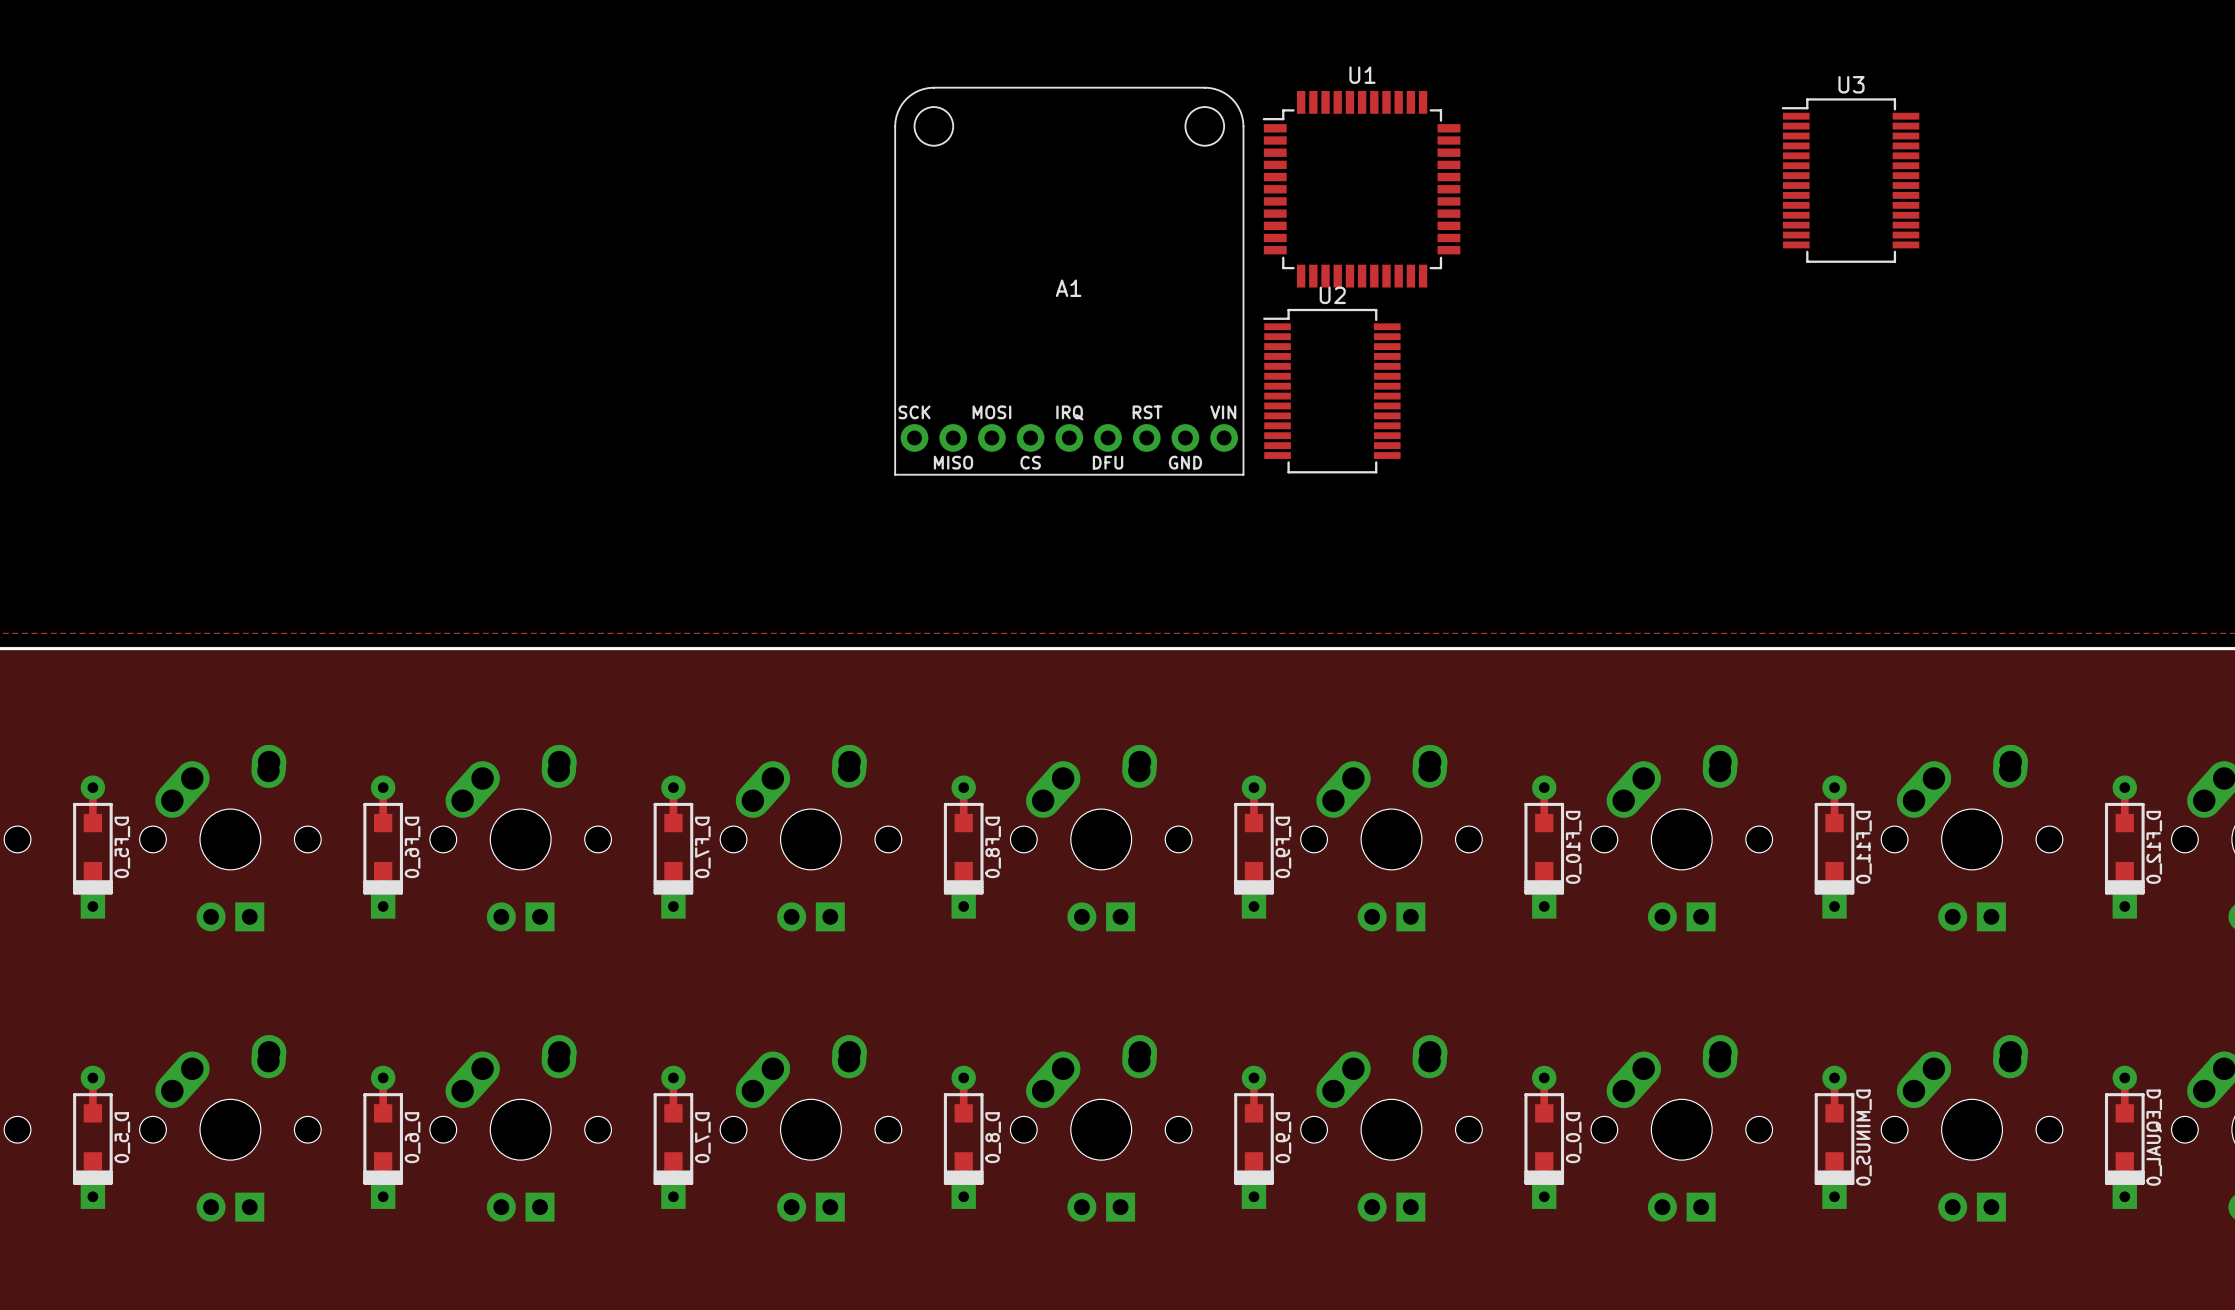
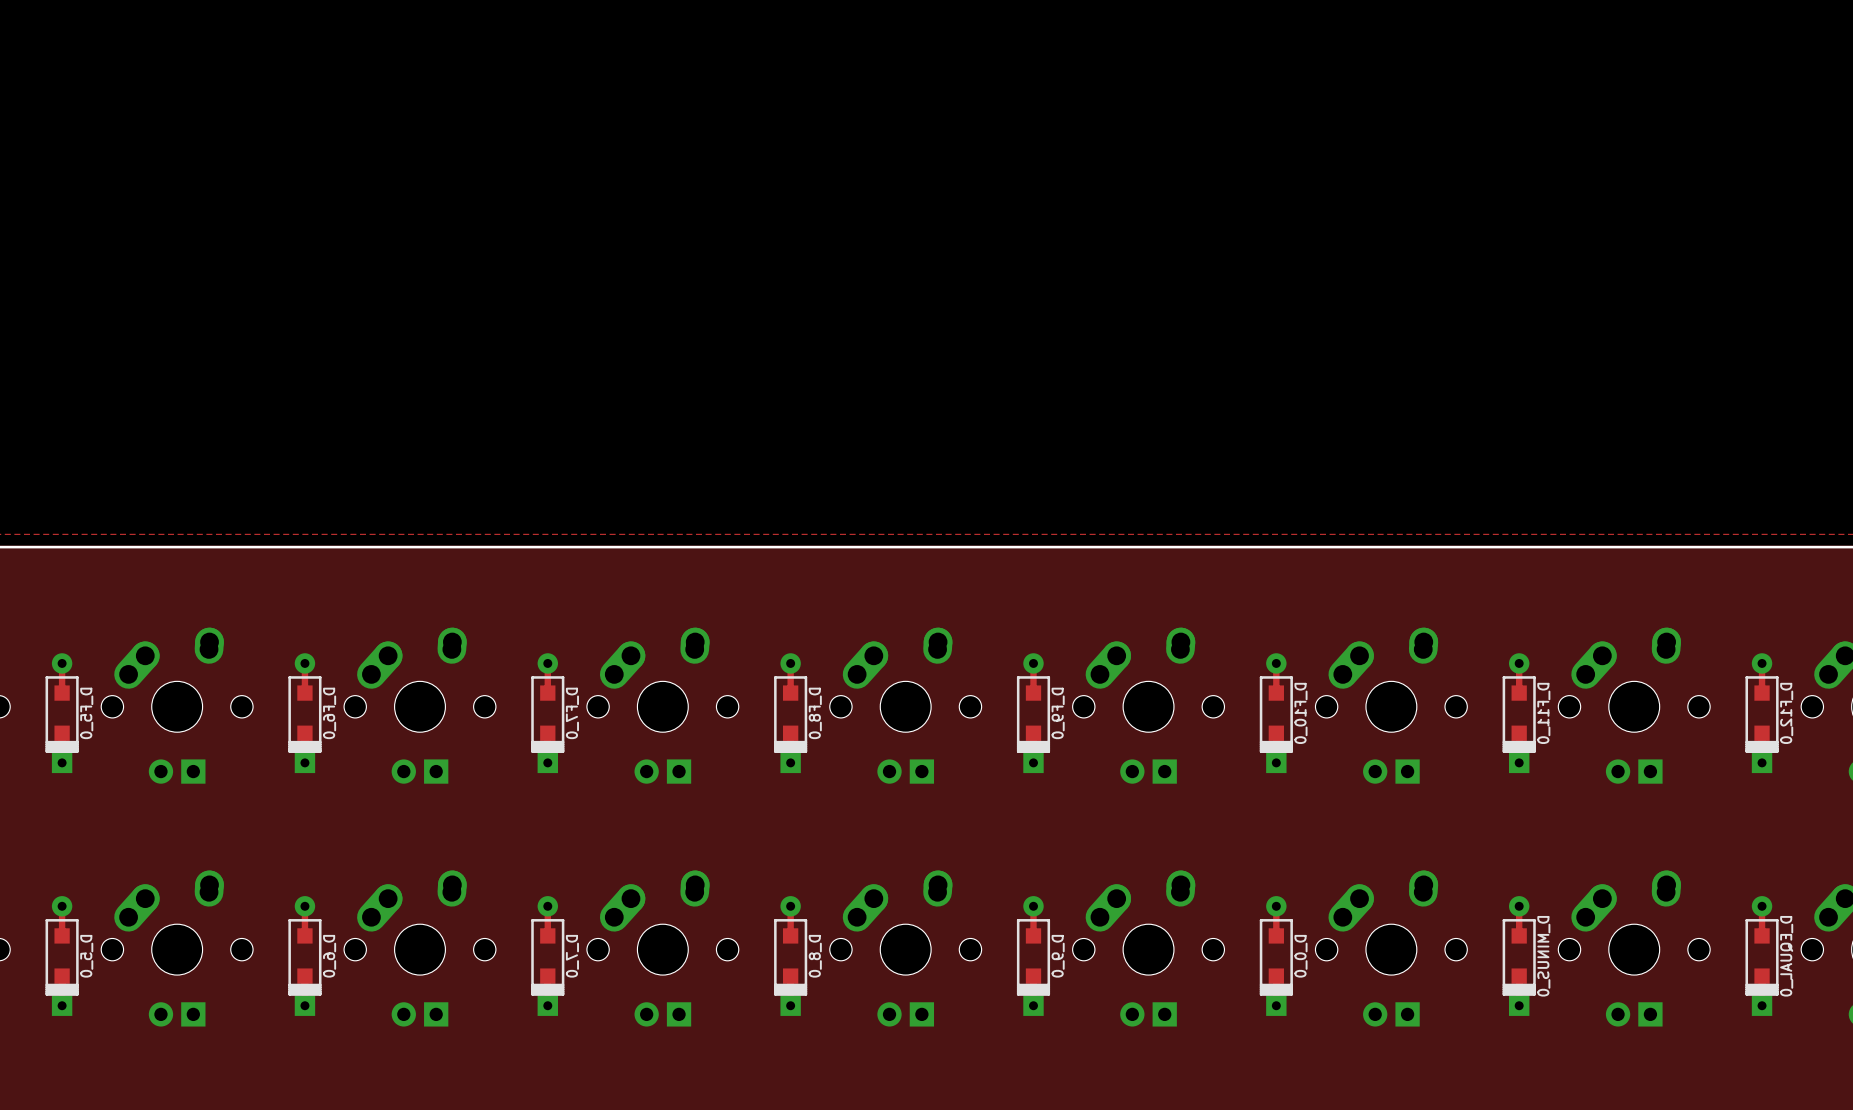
U3: (1850, 180) -> none
U1: (1361, 189) -> none
A1: (1069, 281) -> none
U2: (1331, 391) -> none

